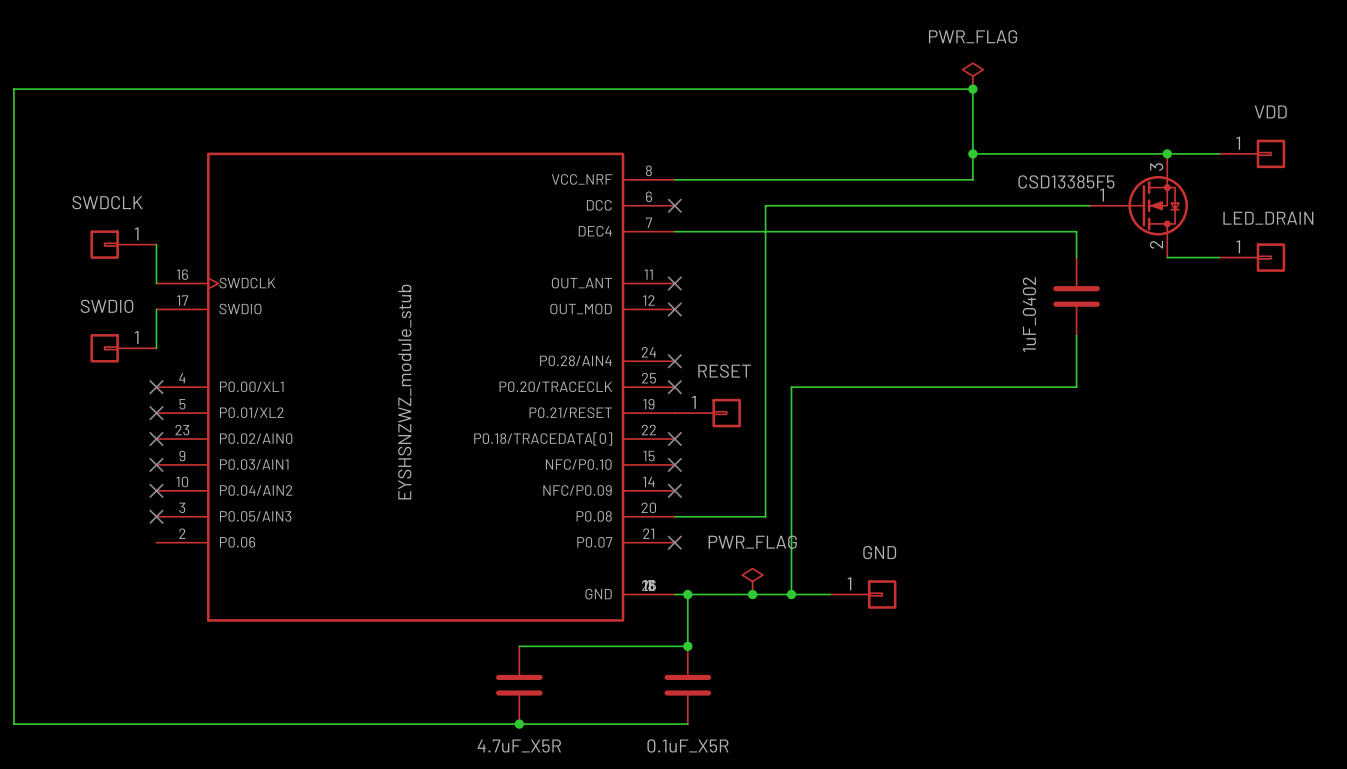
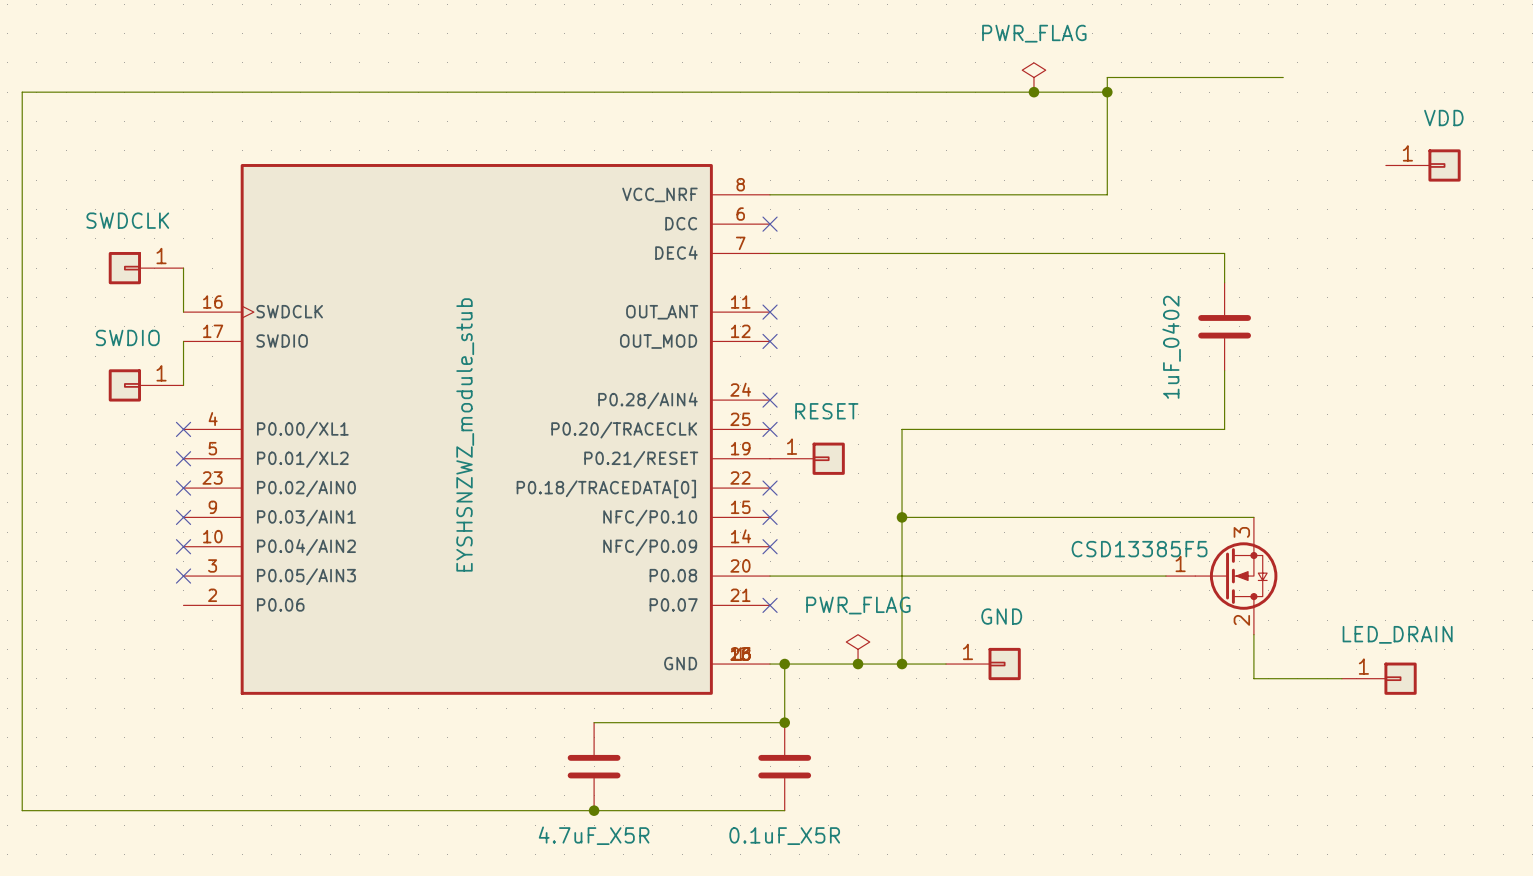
power symbol position: PWR_FLAG (972, 76) -> PWR_FLAG (1033, 77)
wire: none -> (1283, 77) (1107, 77) (1107, 92)
junction: none -> (1033, 92)
wire: (972, 153) (1219, 153) -> none
junction: (972, 153) -> none
junction: (1167, 153) -> none
wire: (1089, 205) (765, 205) (765, 516) -> (1165, 576) (872, 576)
part: CSD13385F5 (1138, 205) -> none
wire: (1167, 257) (1219, 257) -> none
part: LED_DRAIN (1252, 257) -> none
wire: none -> (902, 517) (1253, 517)
junction: none -> (902, 517)
part: none -> CSD13385F5 (1221, 576)
wire: none -> (1253, 634) (1253, 678) (1341, 678)
part: none -> LED_DRAIN (1379, 678)

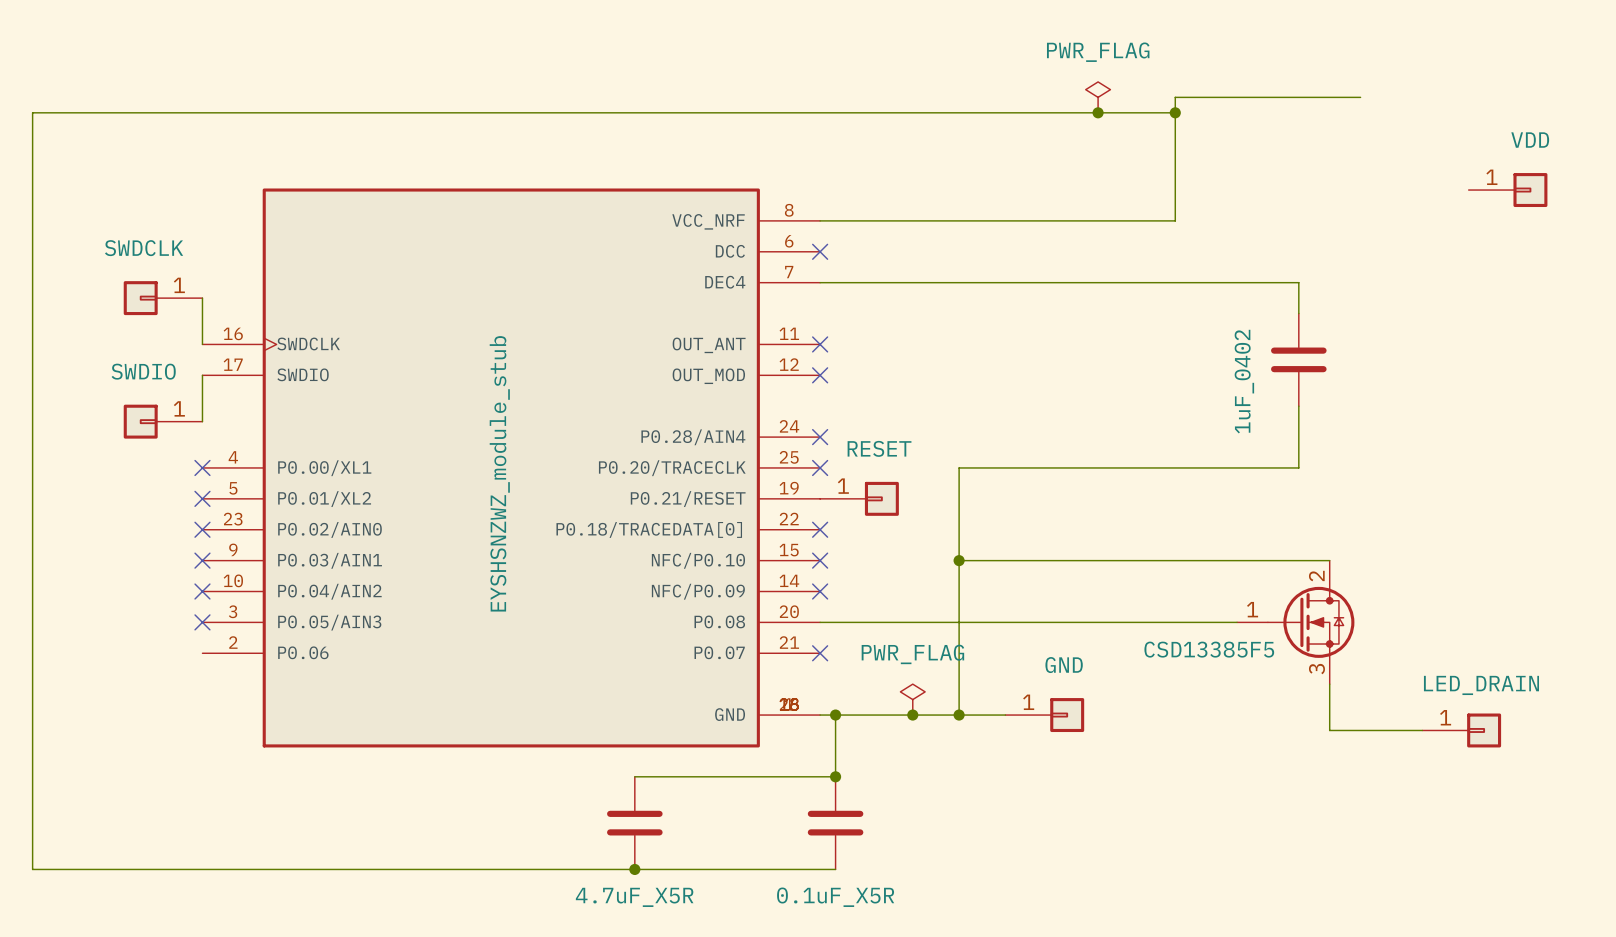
part flip: as is (1236, 576) -> up-down (1311, 622)

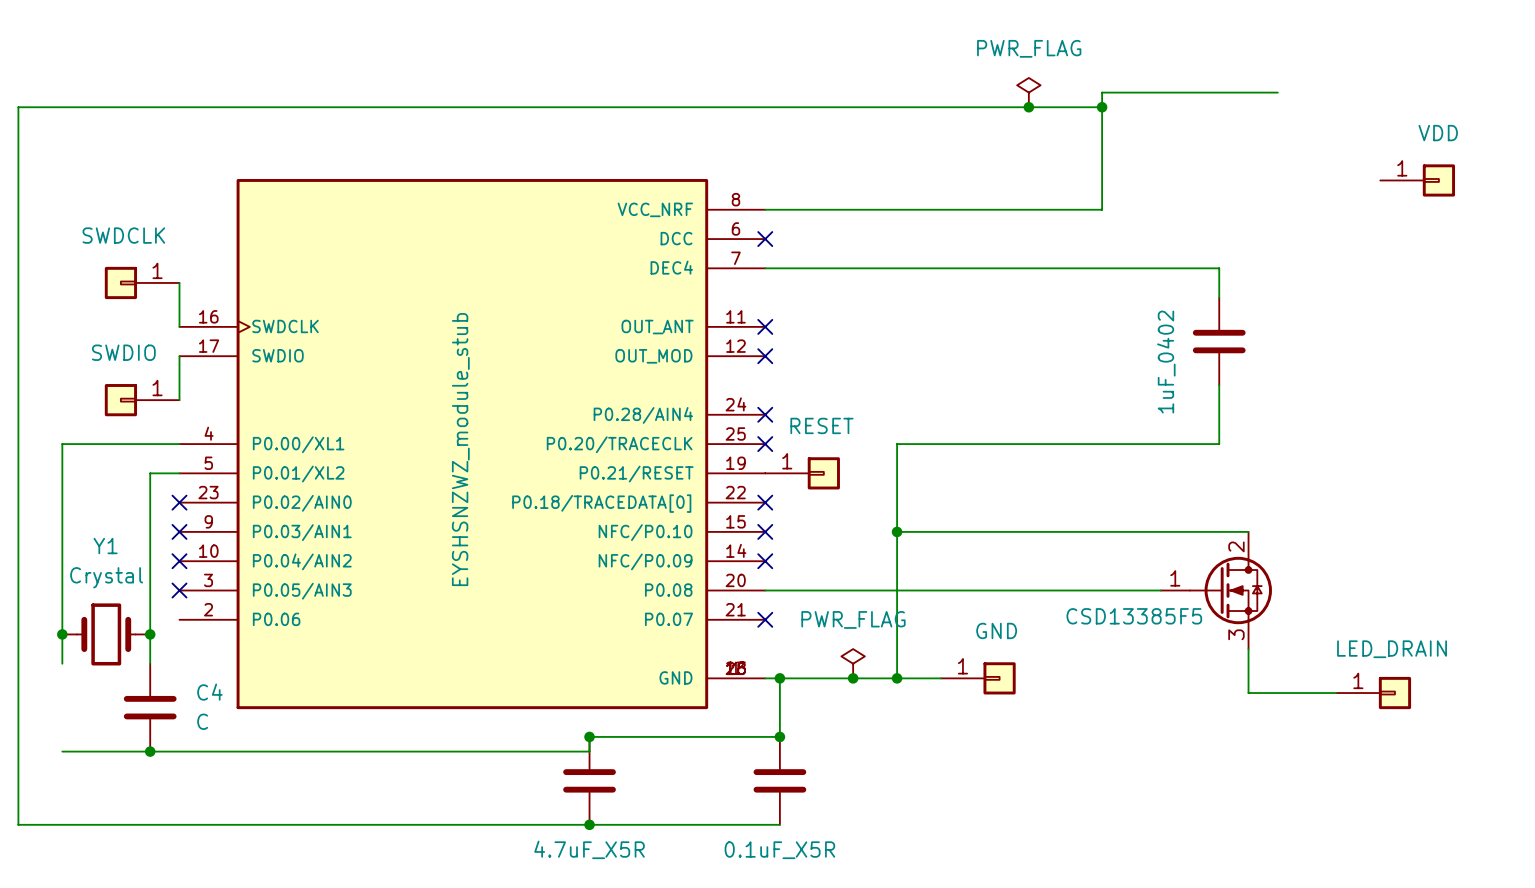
wire: none -> (179, 444) (62, 444) (62, 663)
no-connect mark: (202, 467) -> none
wire: none -> (179, 473) (150, 473) (150, 663)
no-connect mark: (202, 498) -> none
junction: none -> (62, 634)
Y1: none -> Crystal (106, 634)
junction: none -> (150, 634)
C4: none -> C (150, 707)
wire: none -> (589, 736) (589, 751) (62, 751)
junction: none -> (589, 736)
junction: none -> (150, 751)

